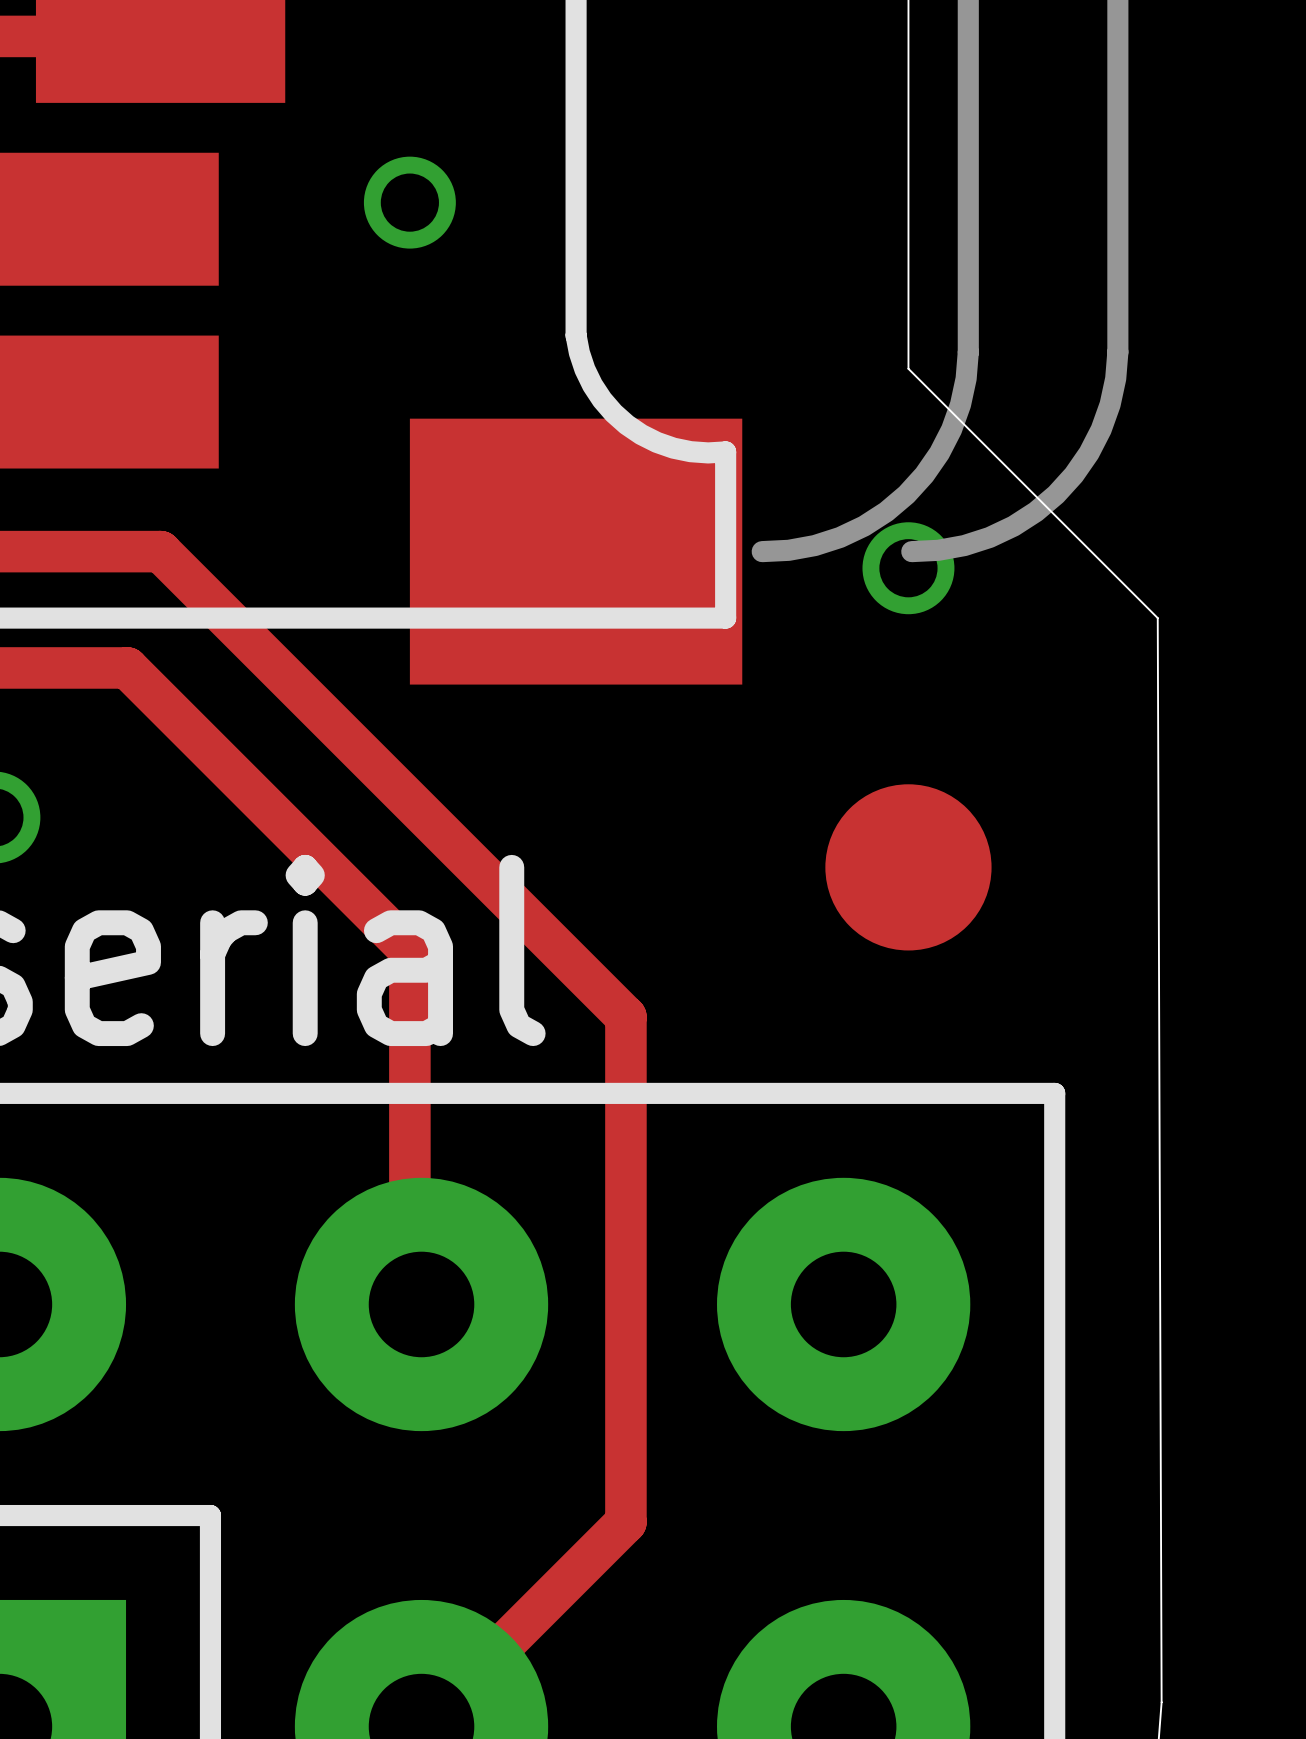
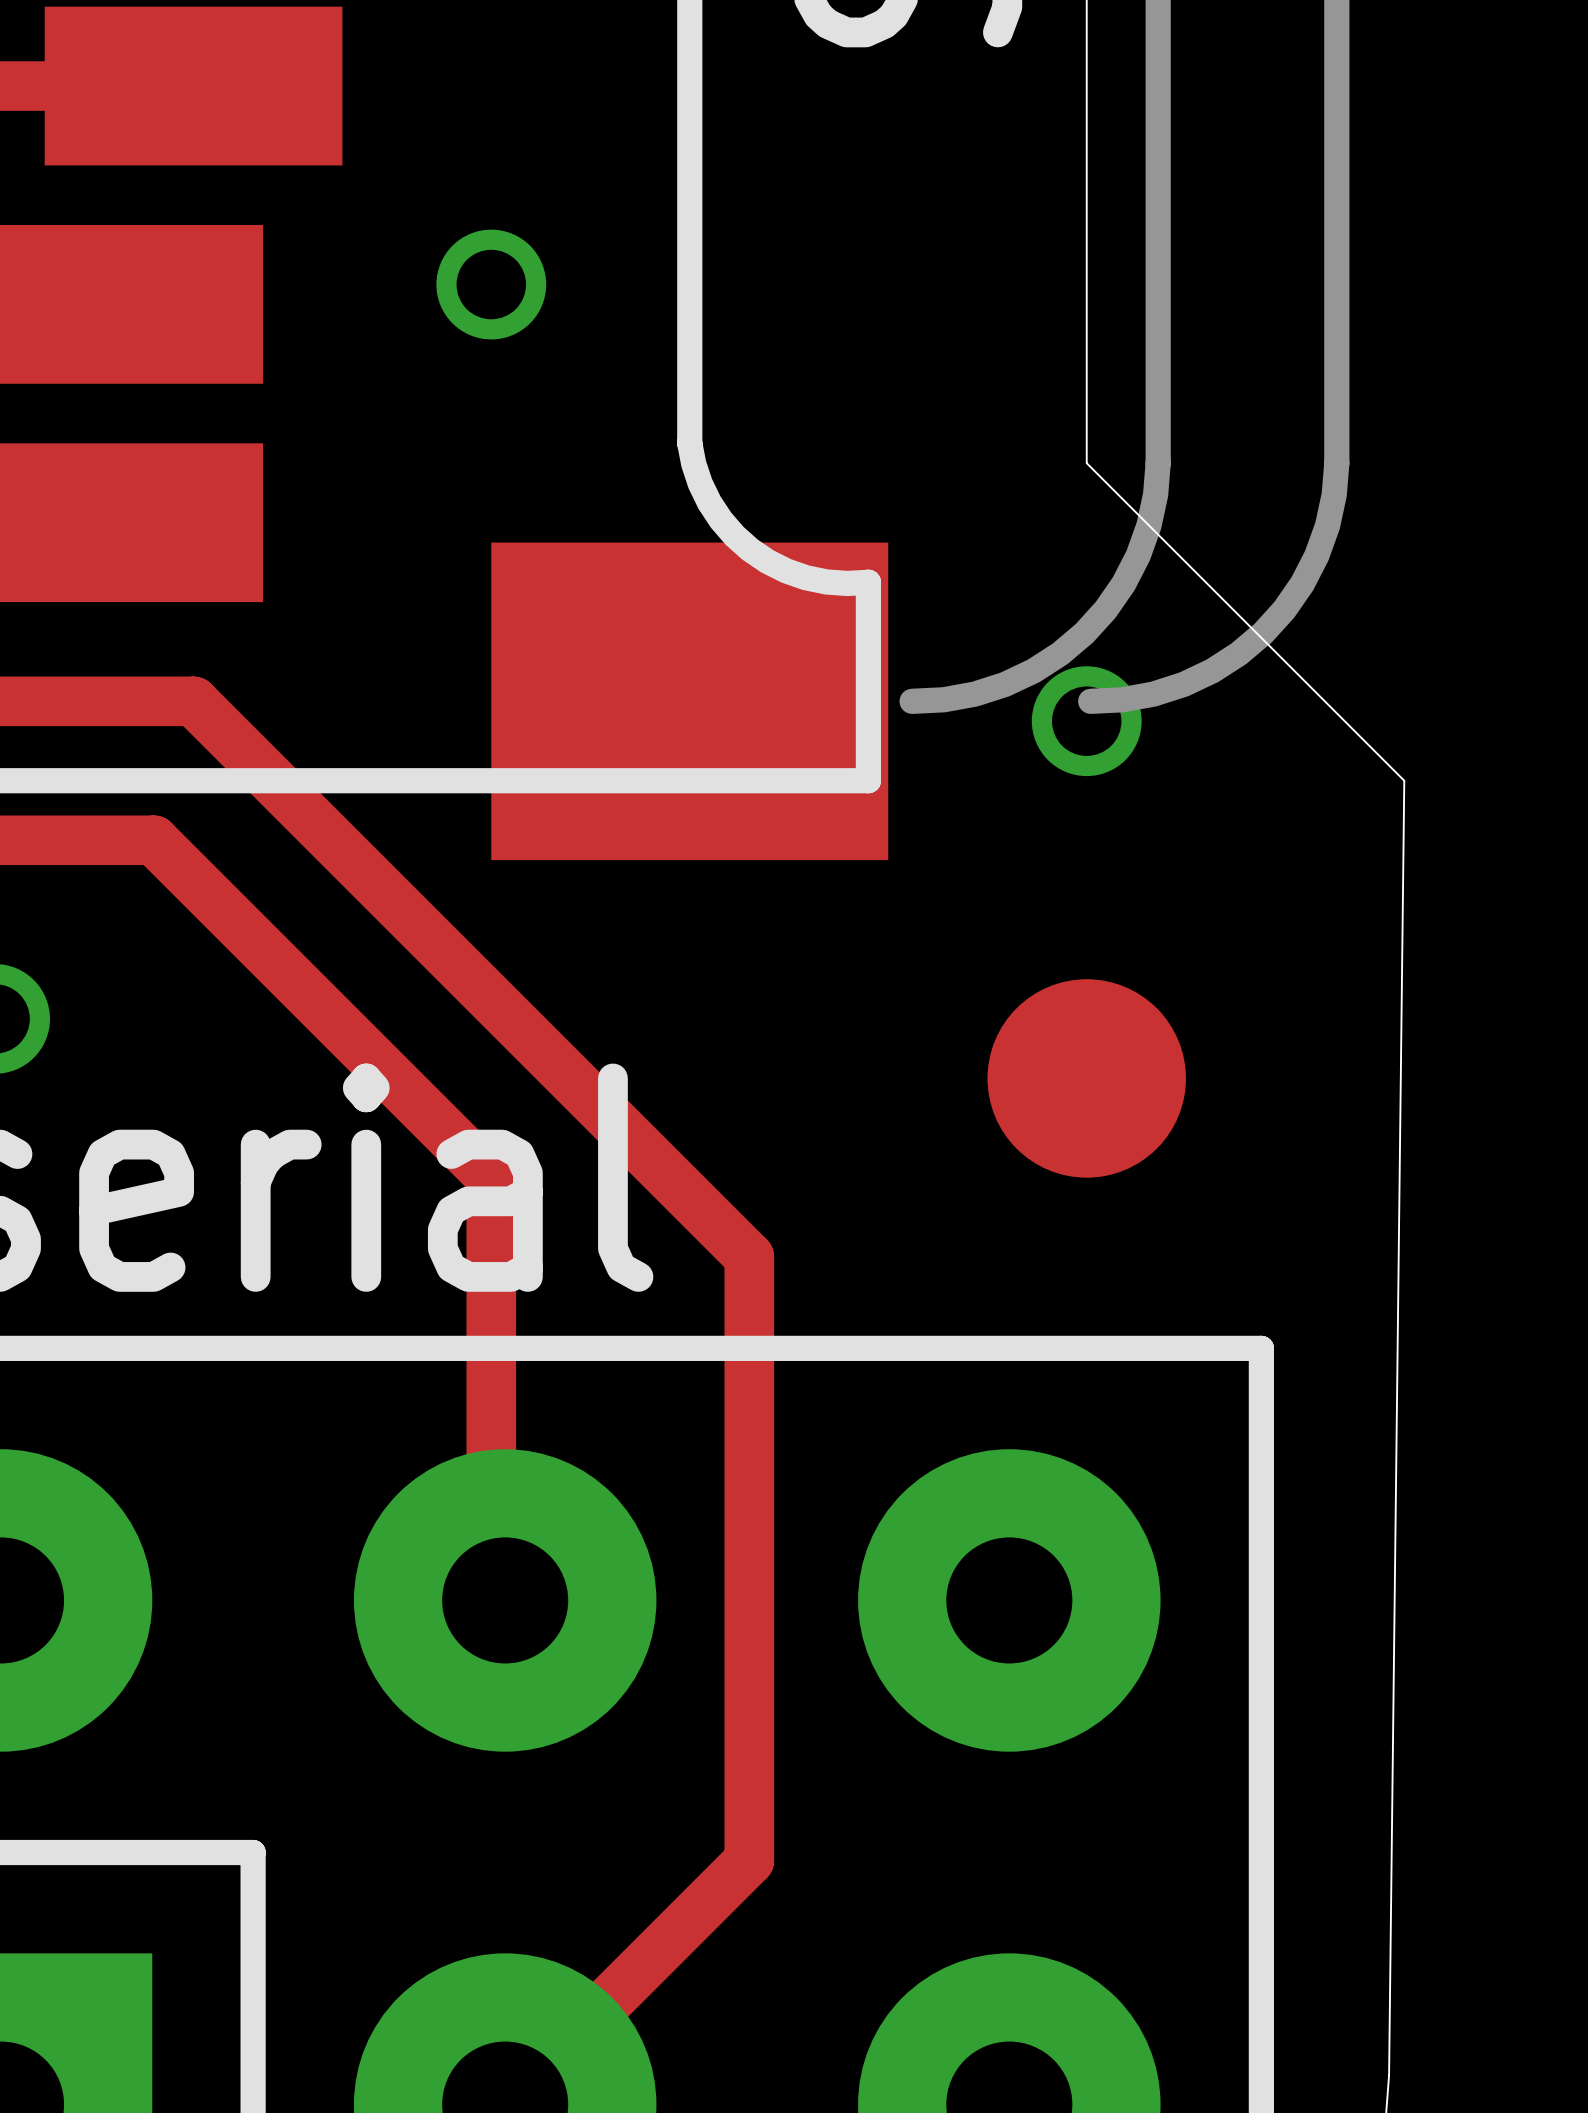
board edge: (908, 352) (908, 368) (1157, 618) (1161, 1702) -> (1086, 463) (1404, 780) (1389, 2075)

